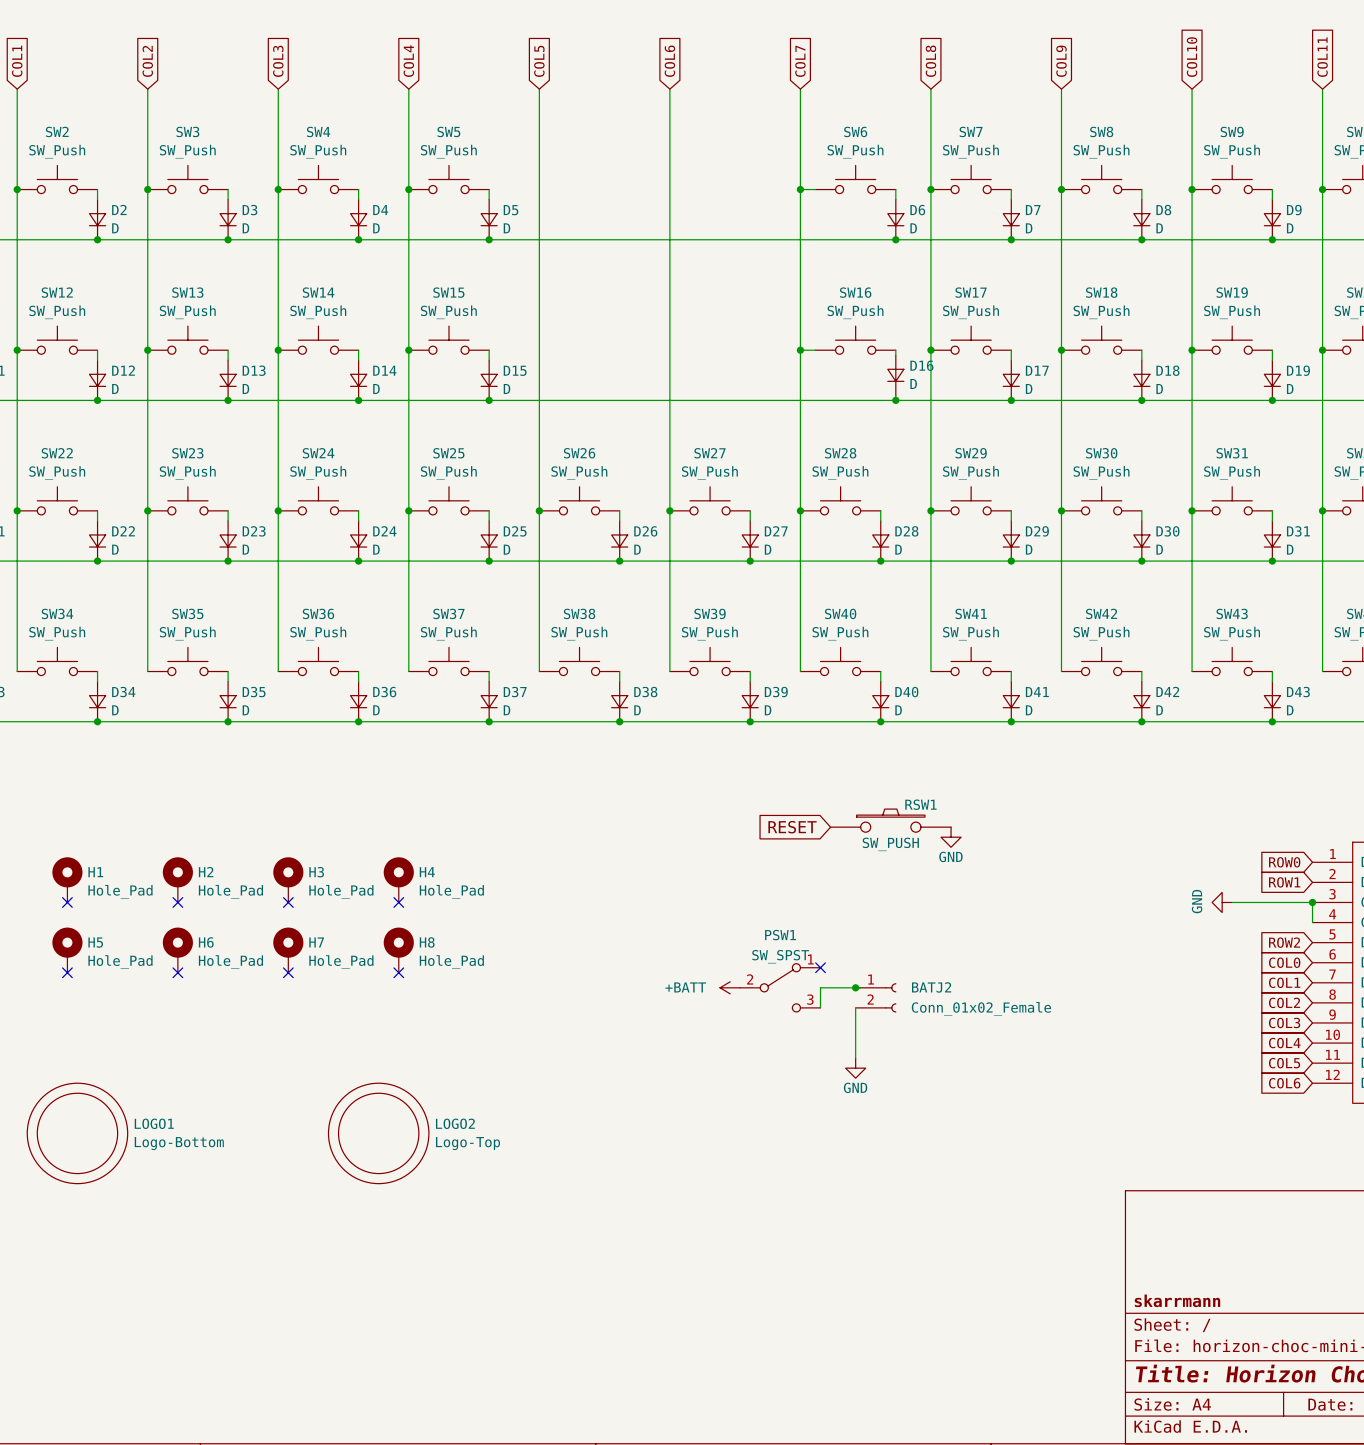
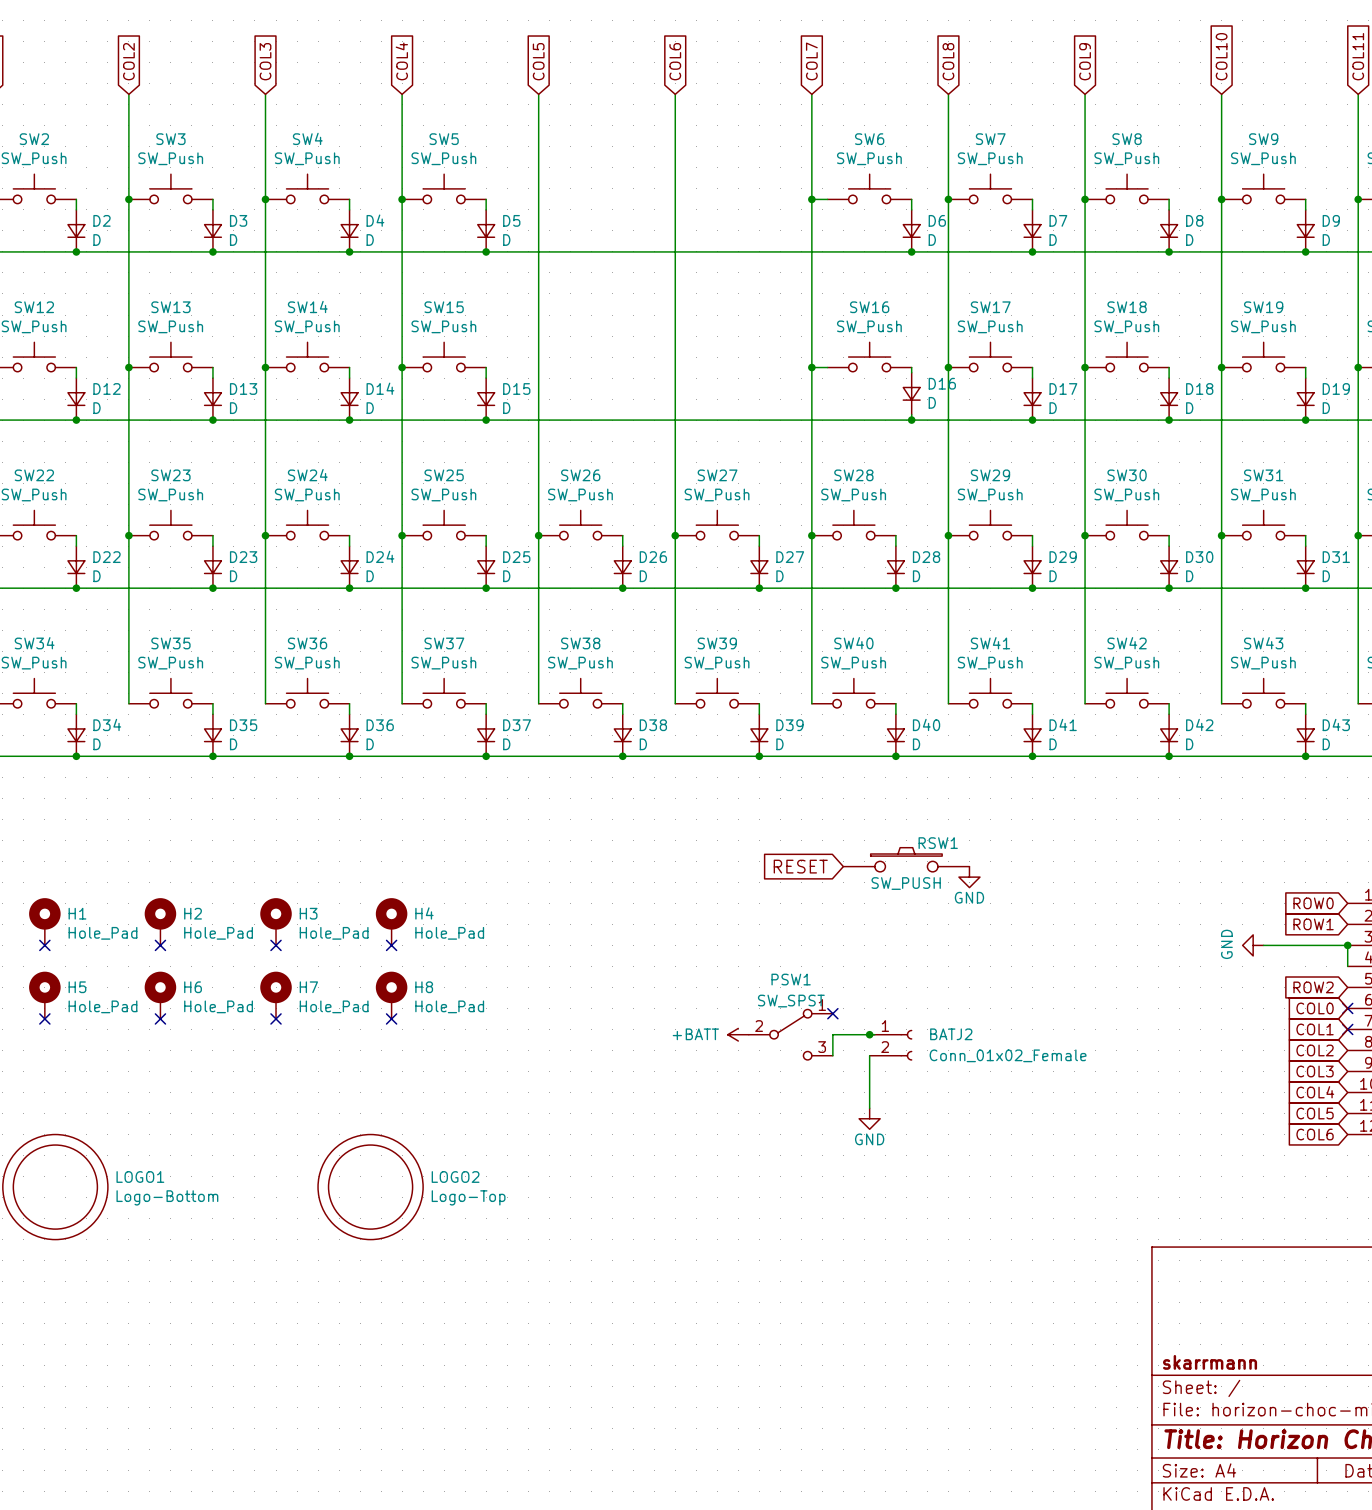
no-connect mark: none -> (1347, 1008)
no-connect mark: none -> (1347, 1029)

